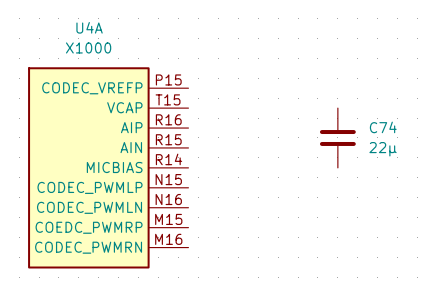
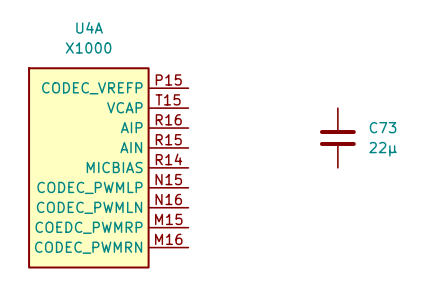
C74 name: C74 (383, 127) -> C73 (383, 127)

